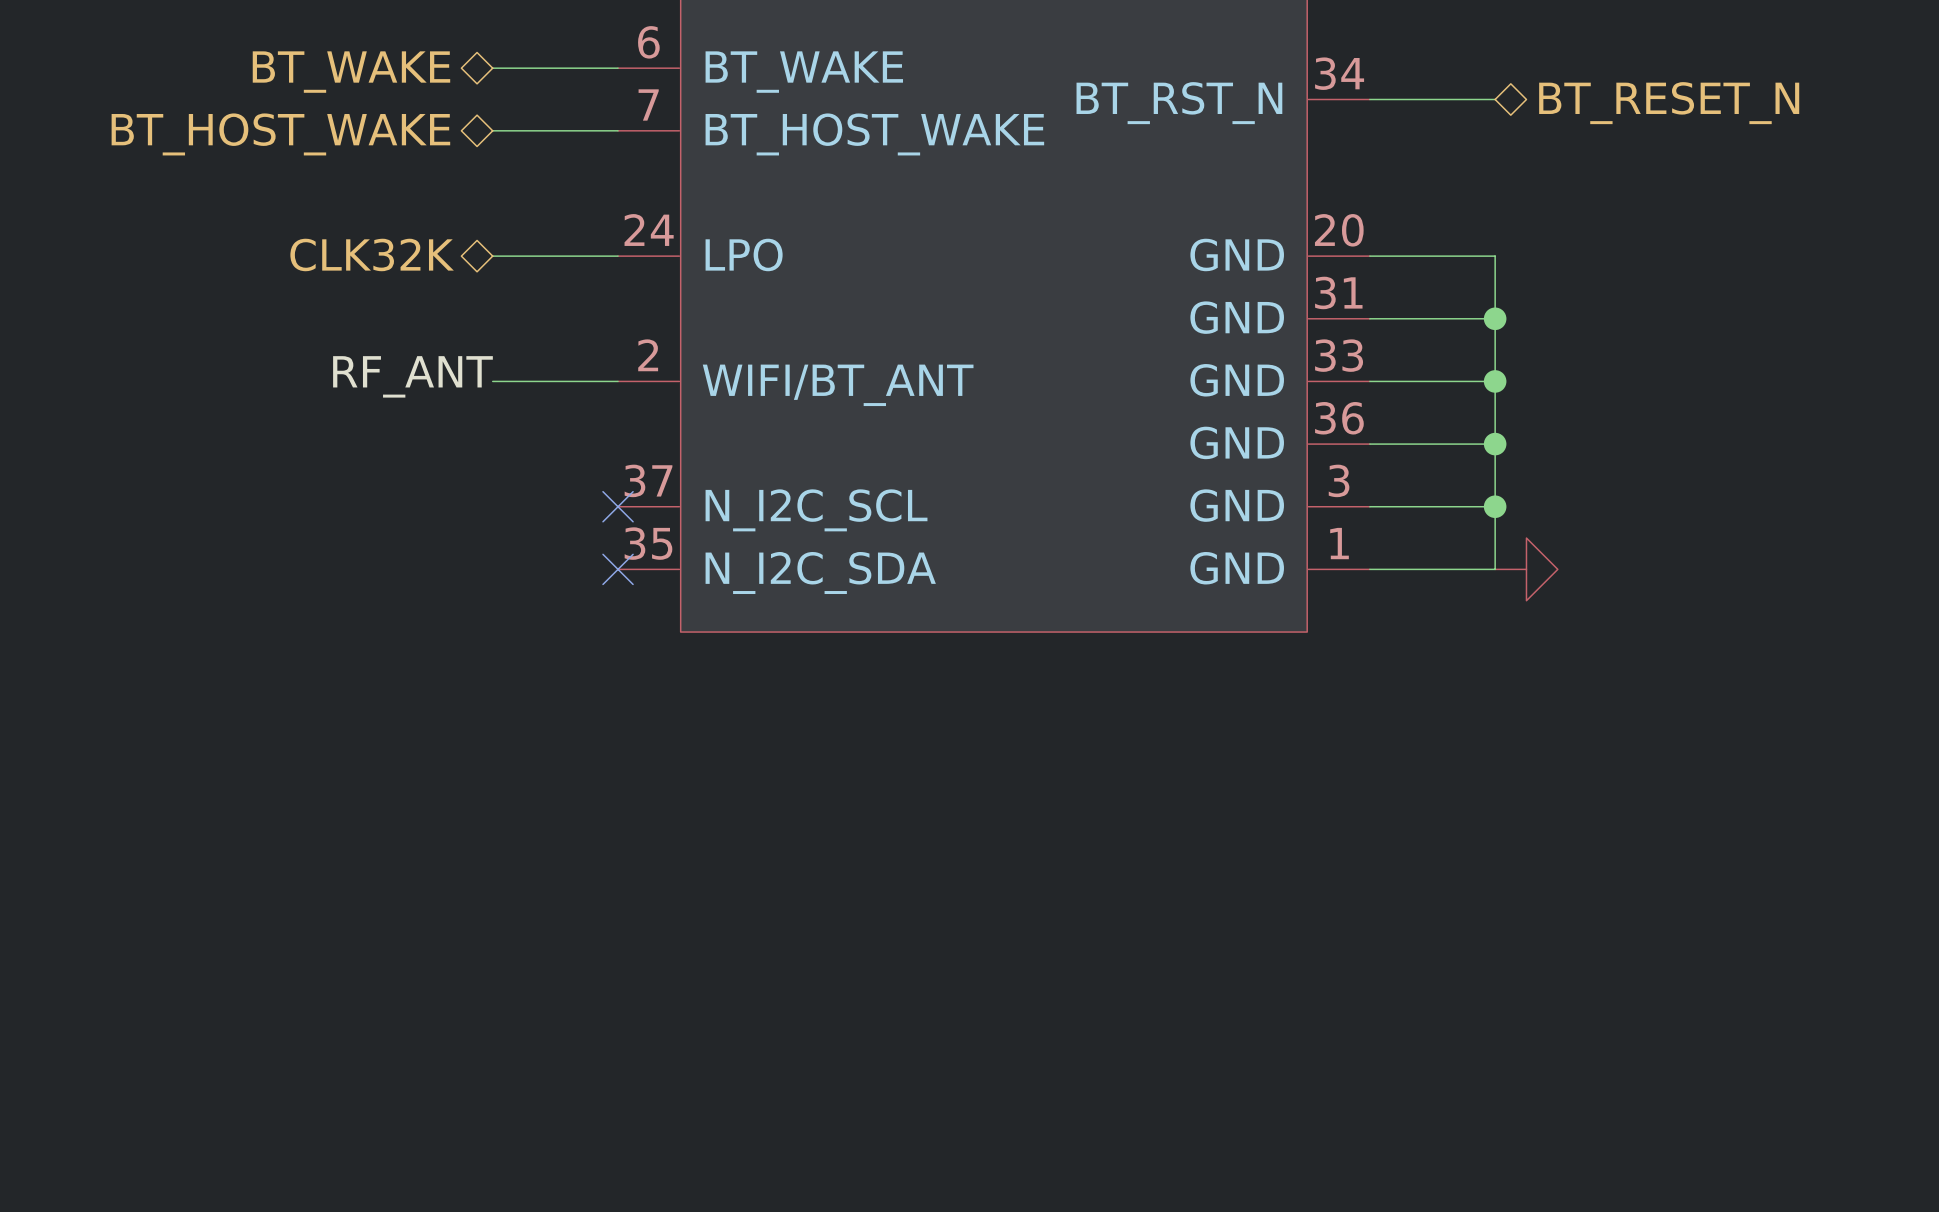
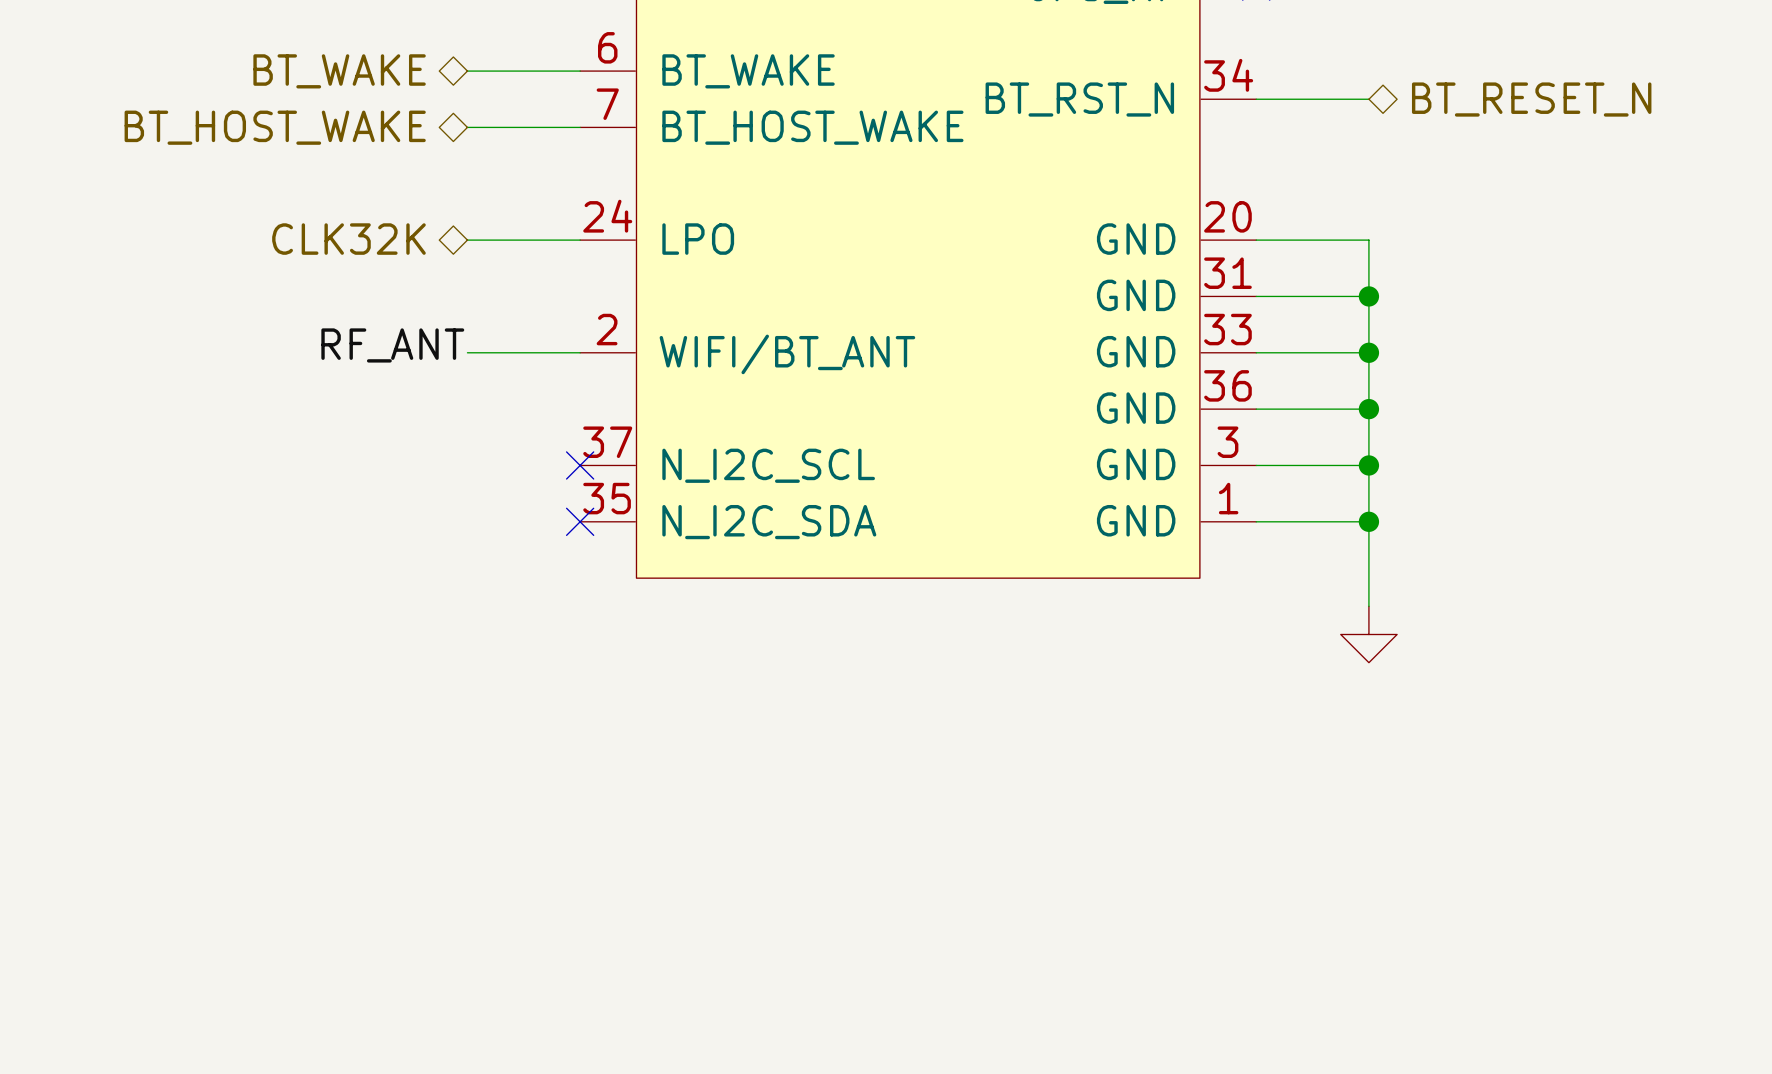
wire: none -> (1368, 521) (1368, 606)
junction: none -> (1368, 521)
power symbol rotation: 0° (1526, 569) -> 90° clockwise (1368, 634)
power symbol position: (1526, 569) -> (1368, 634)

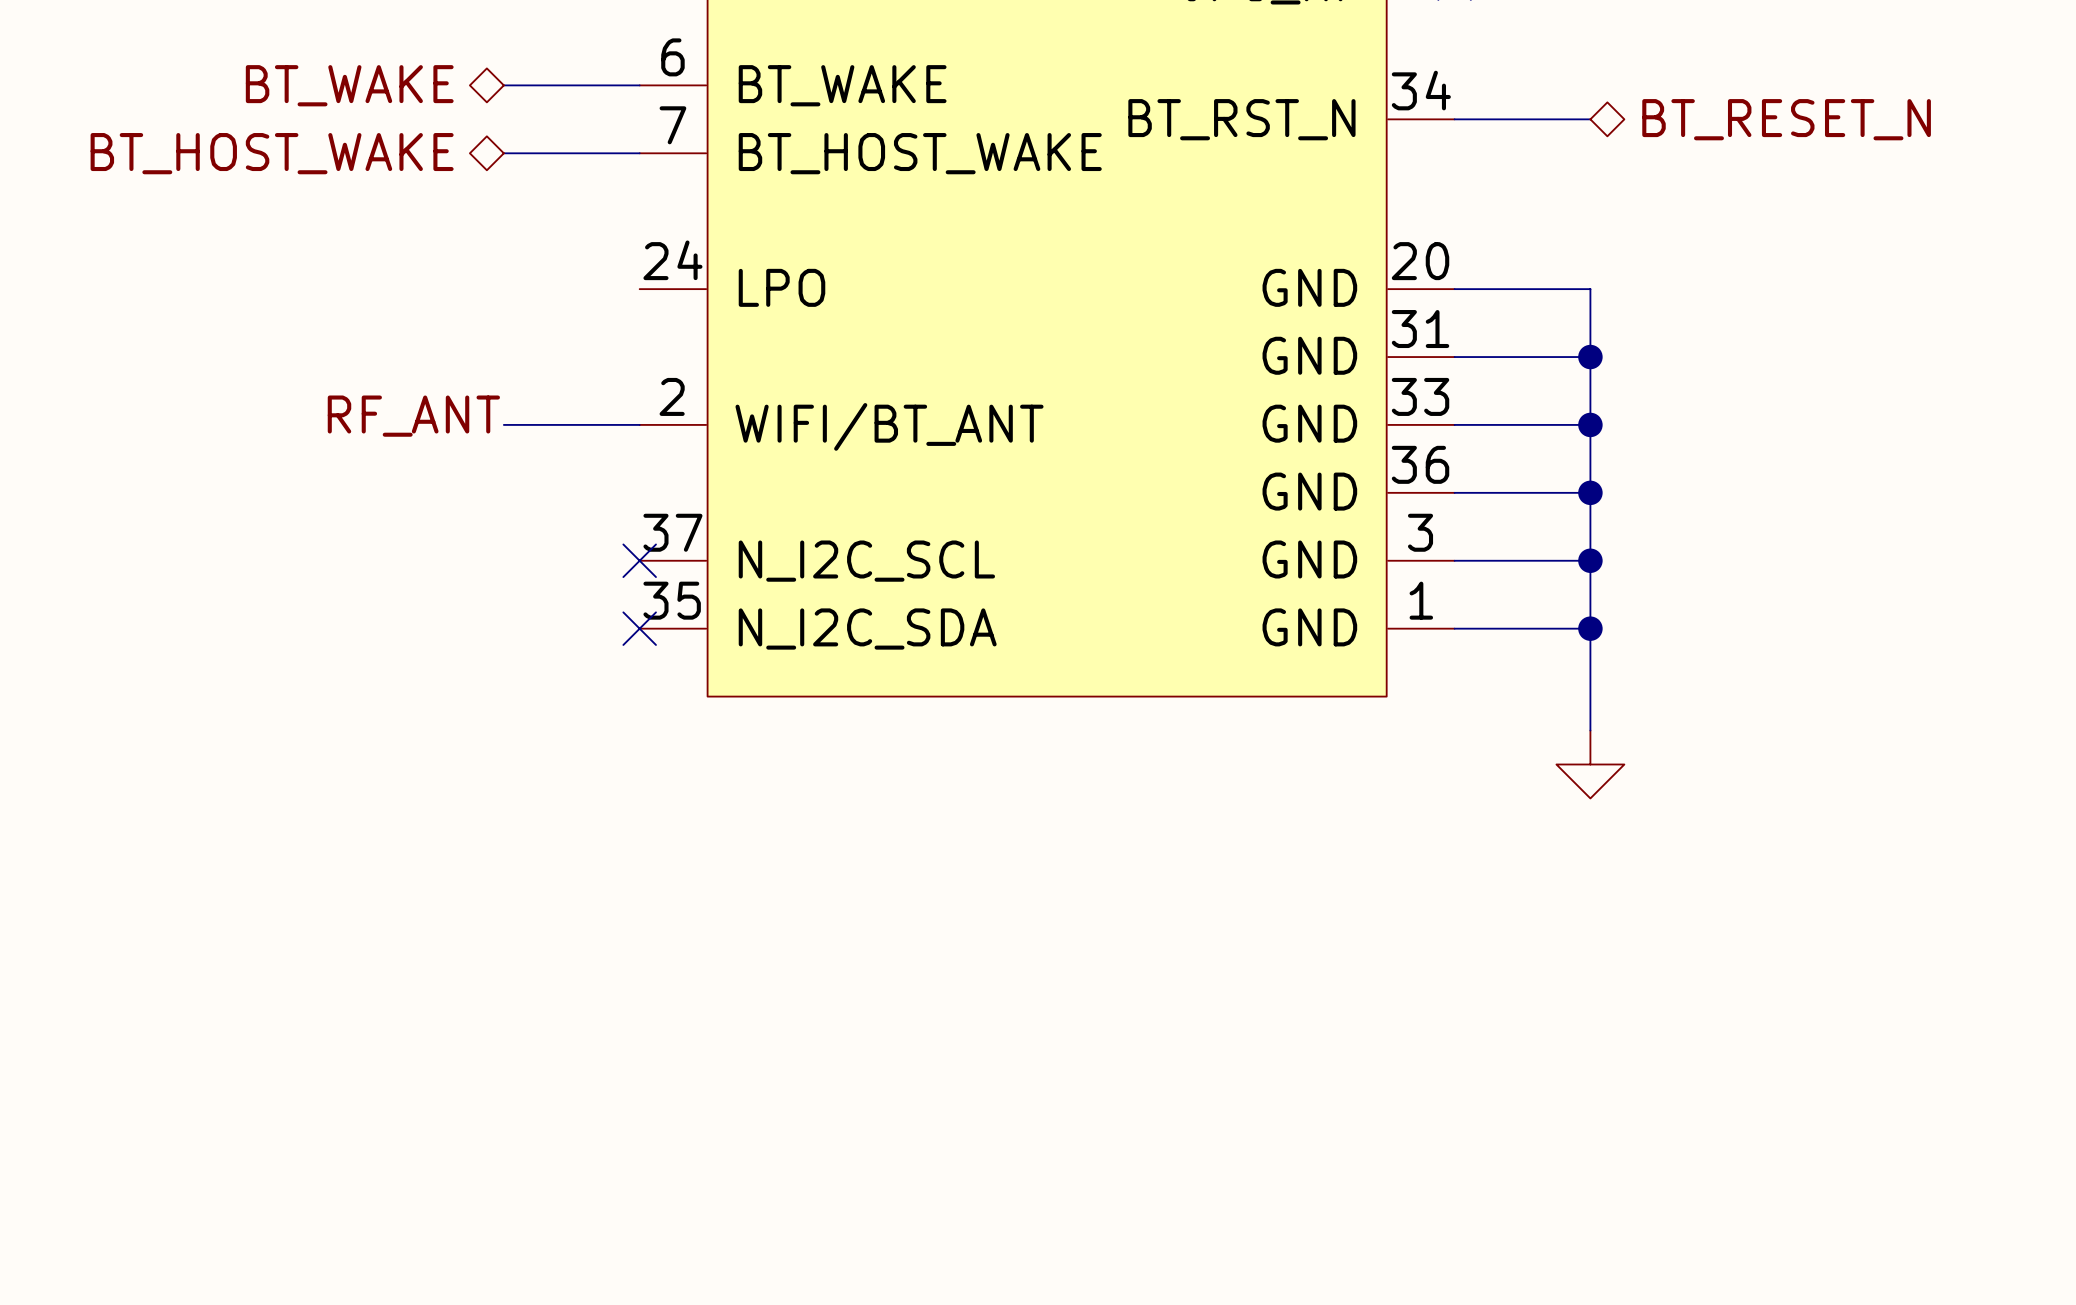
hierarchical label: CLK32K (348, 239) -> none
wire: (467, 240) (580, 240) -> none

